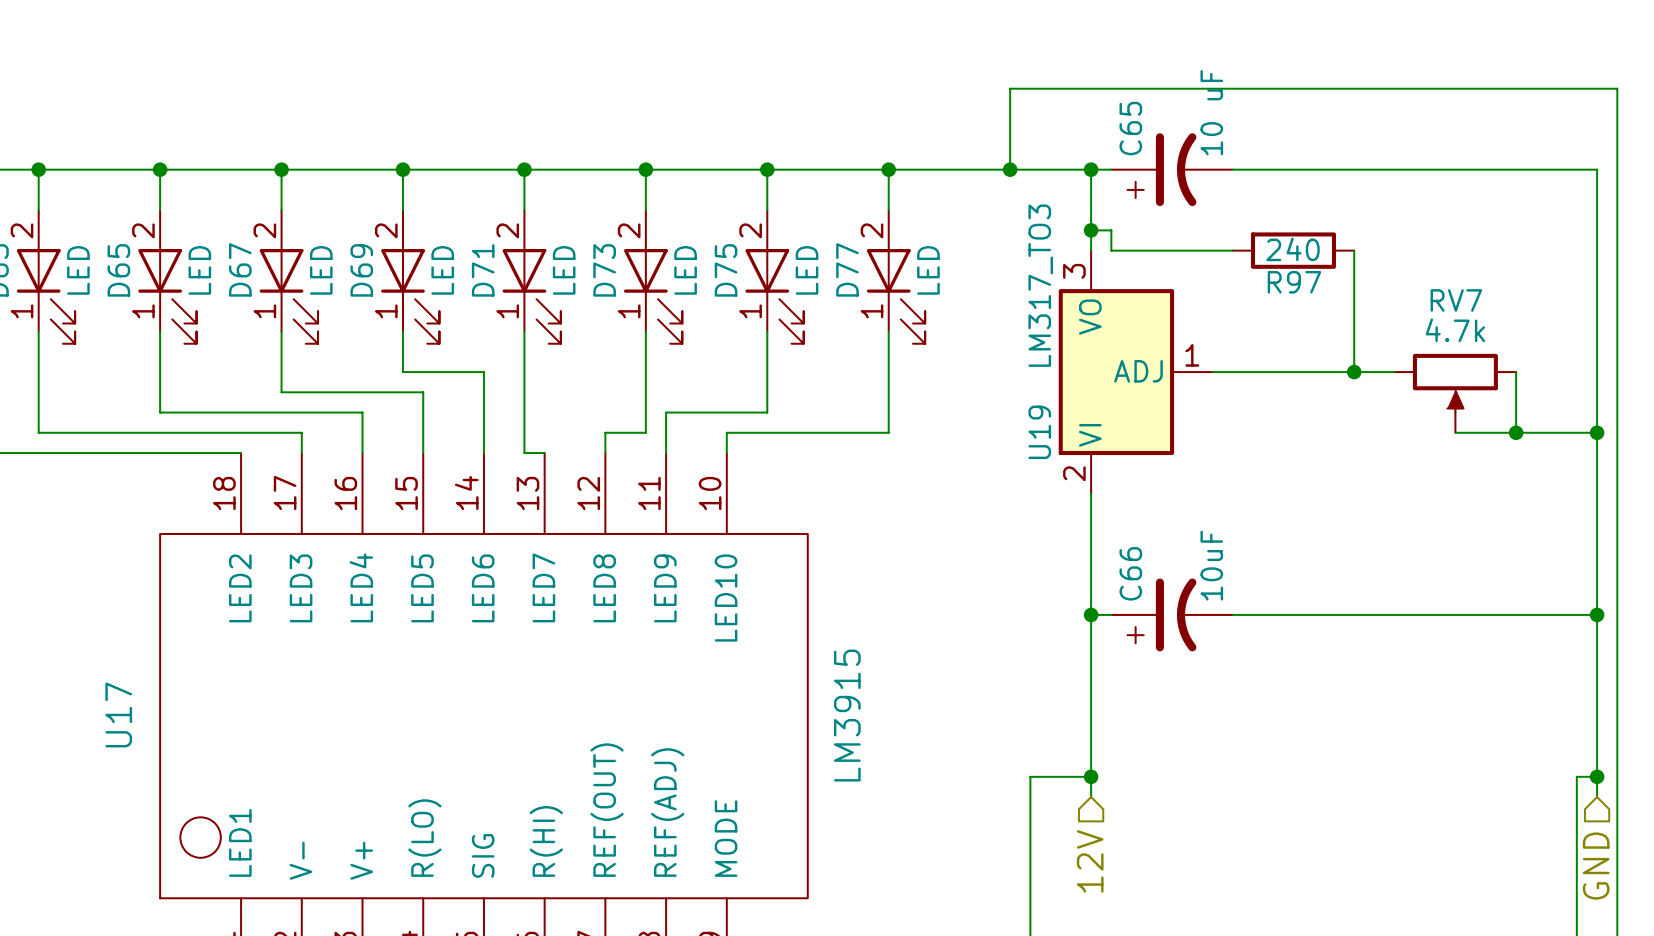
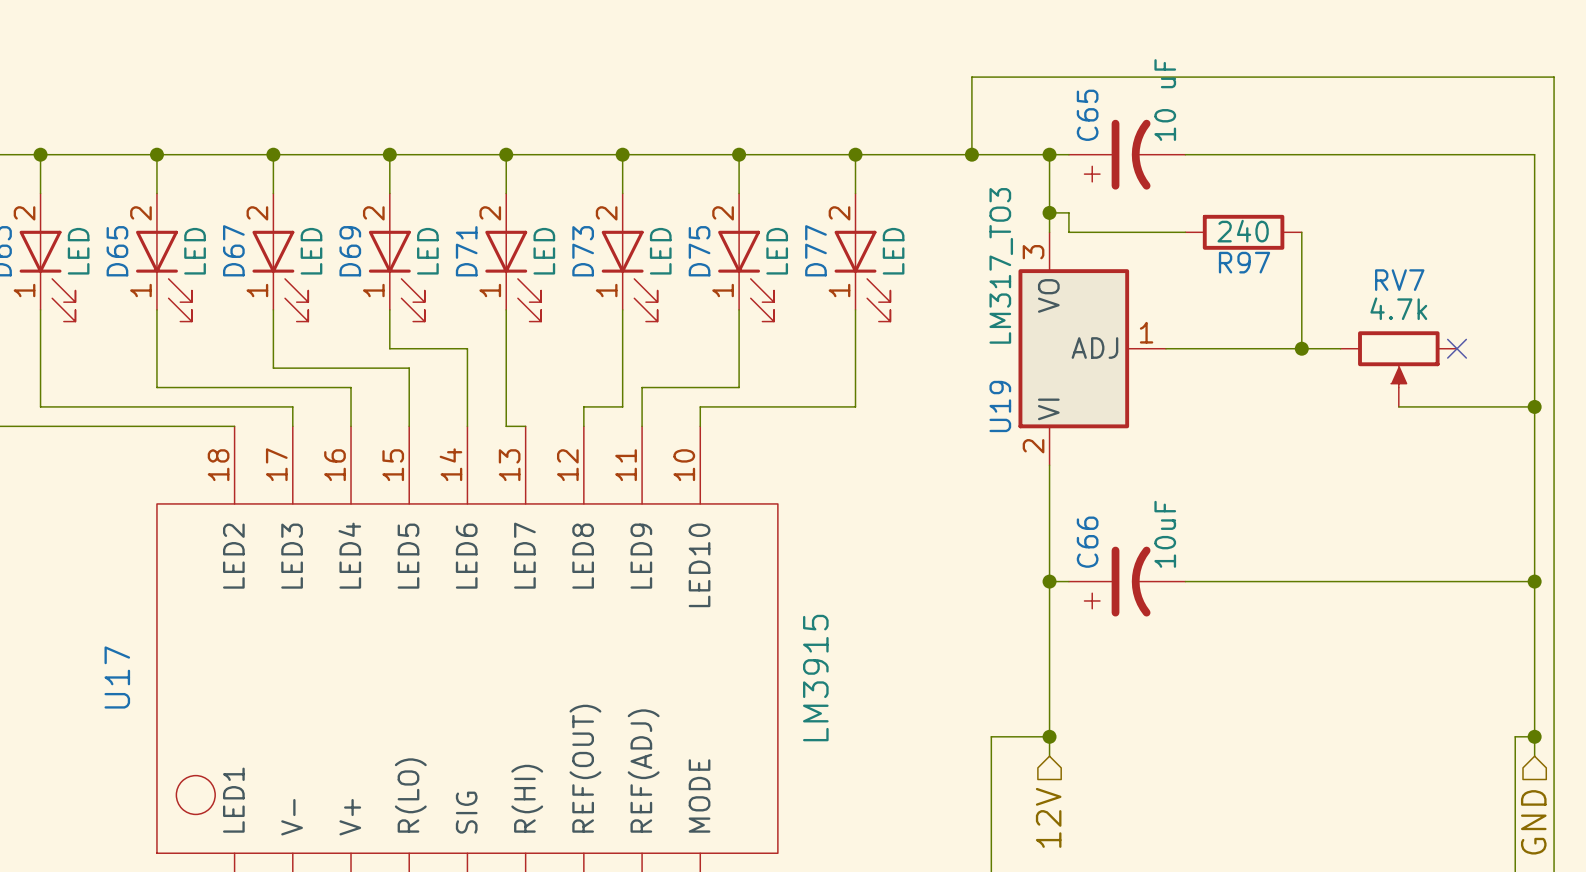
wire: (1516, 372) (1516, 432) -> none
no-connect mark: none -> (1457, 348)
junction: (1516, 432) -> none

